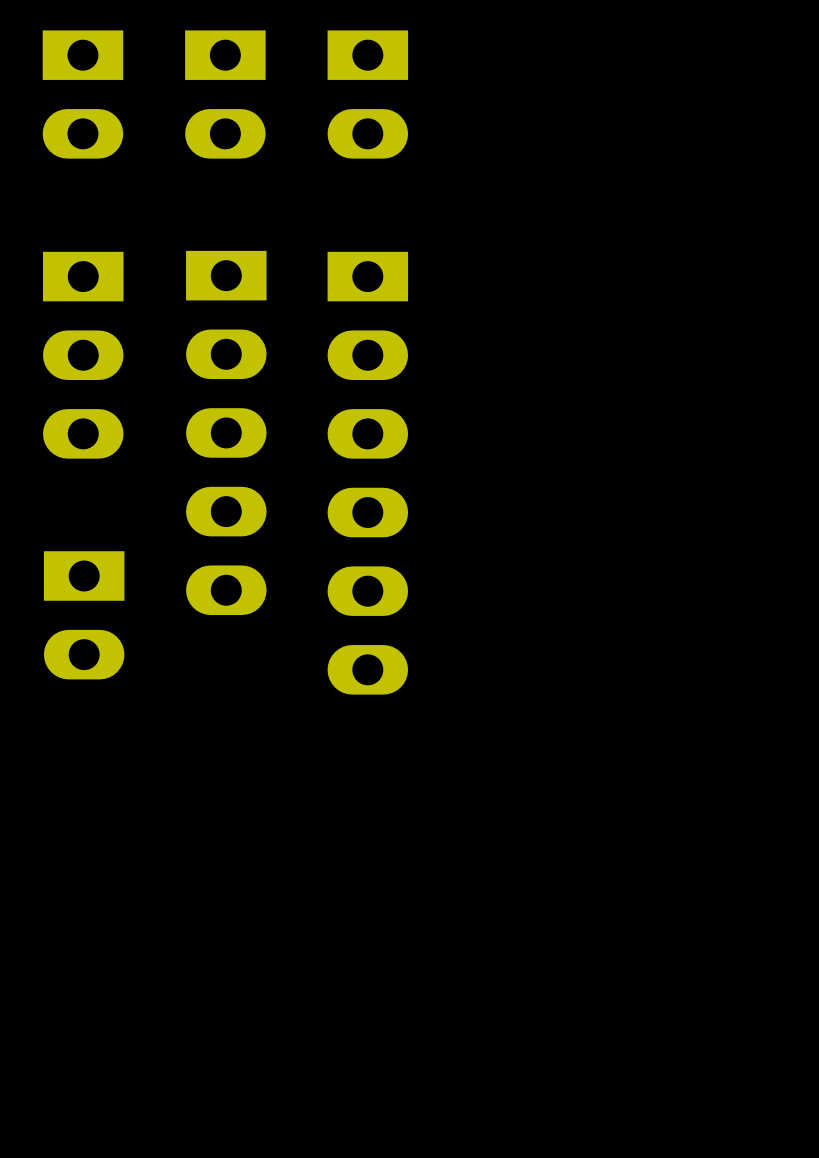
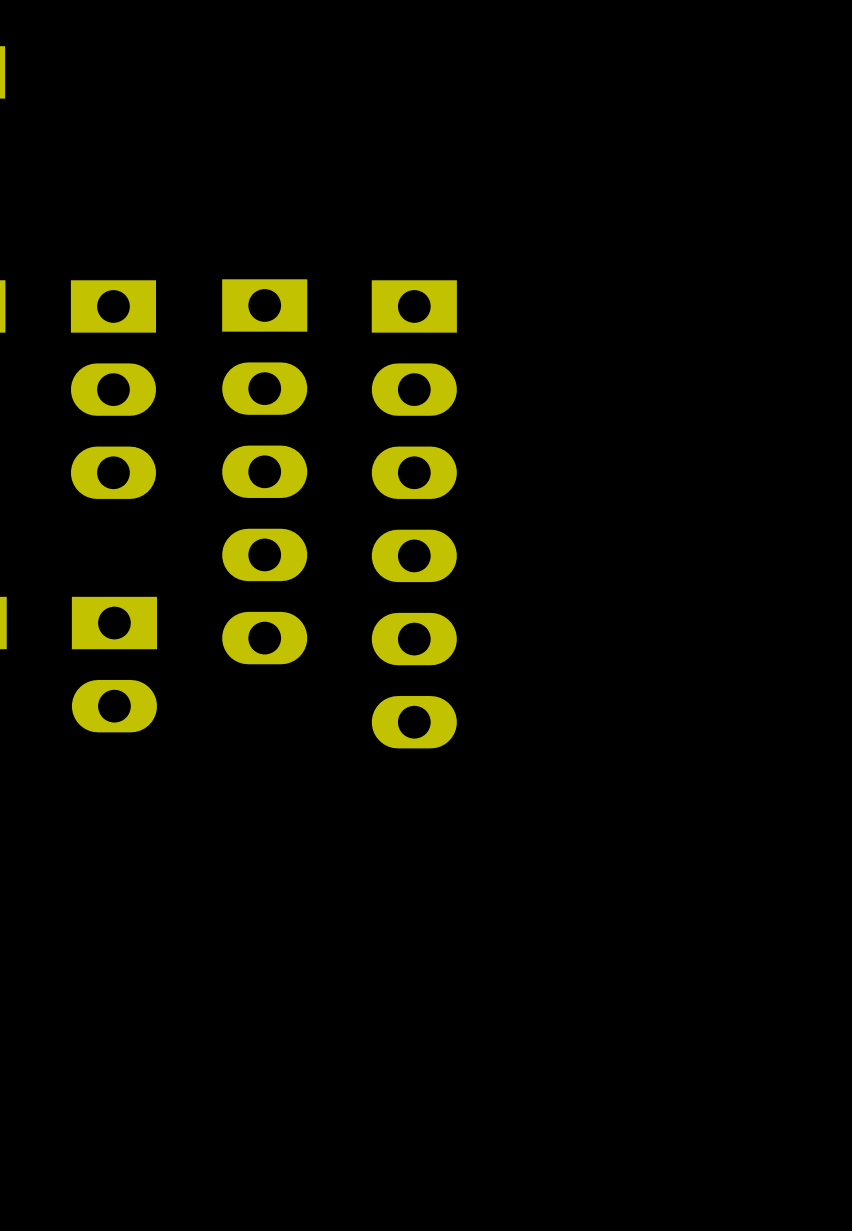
part: (82, 94) -> none
part: (225, 94) -> none
part: (367, 94) -> none

